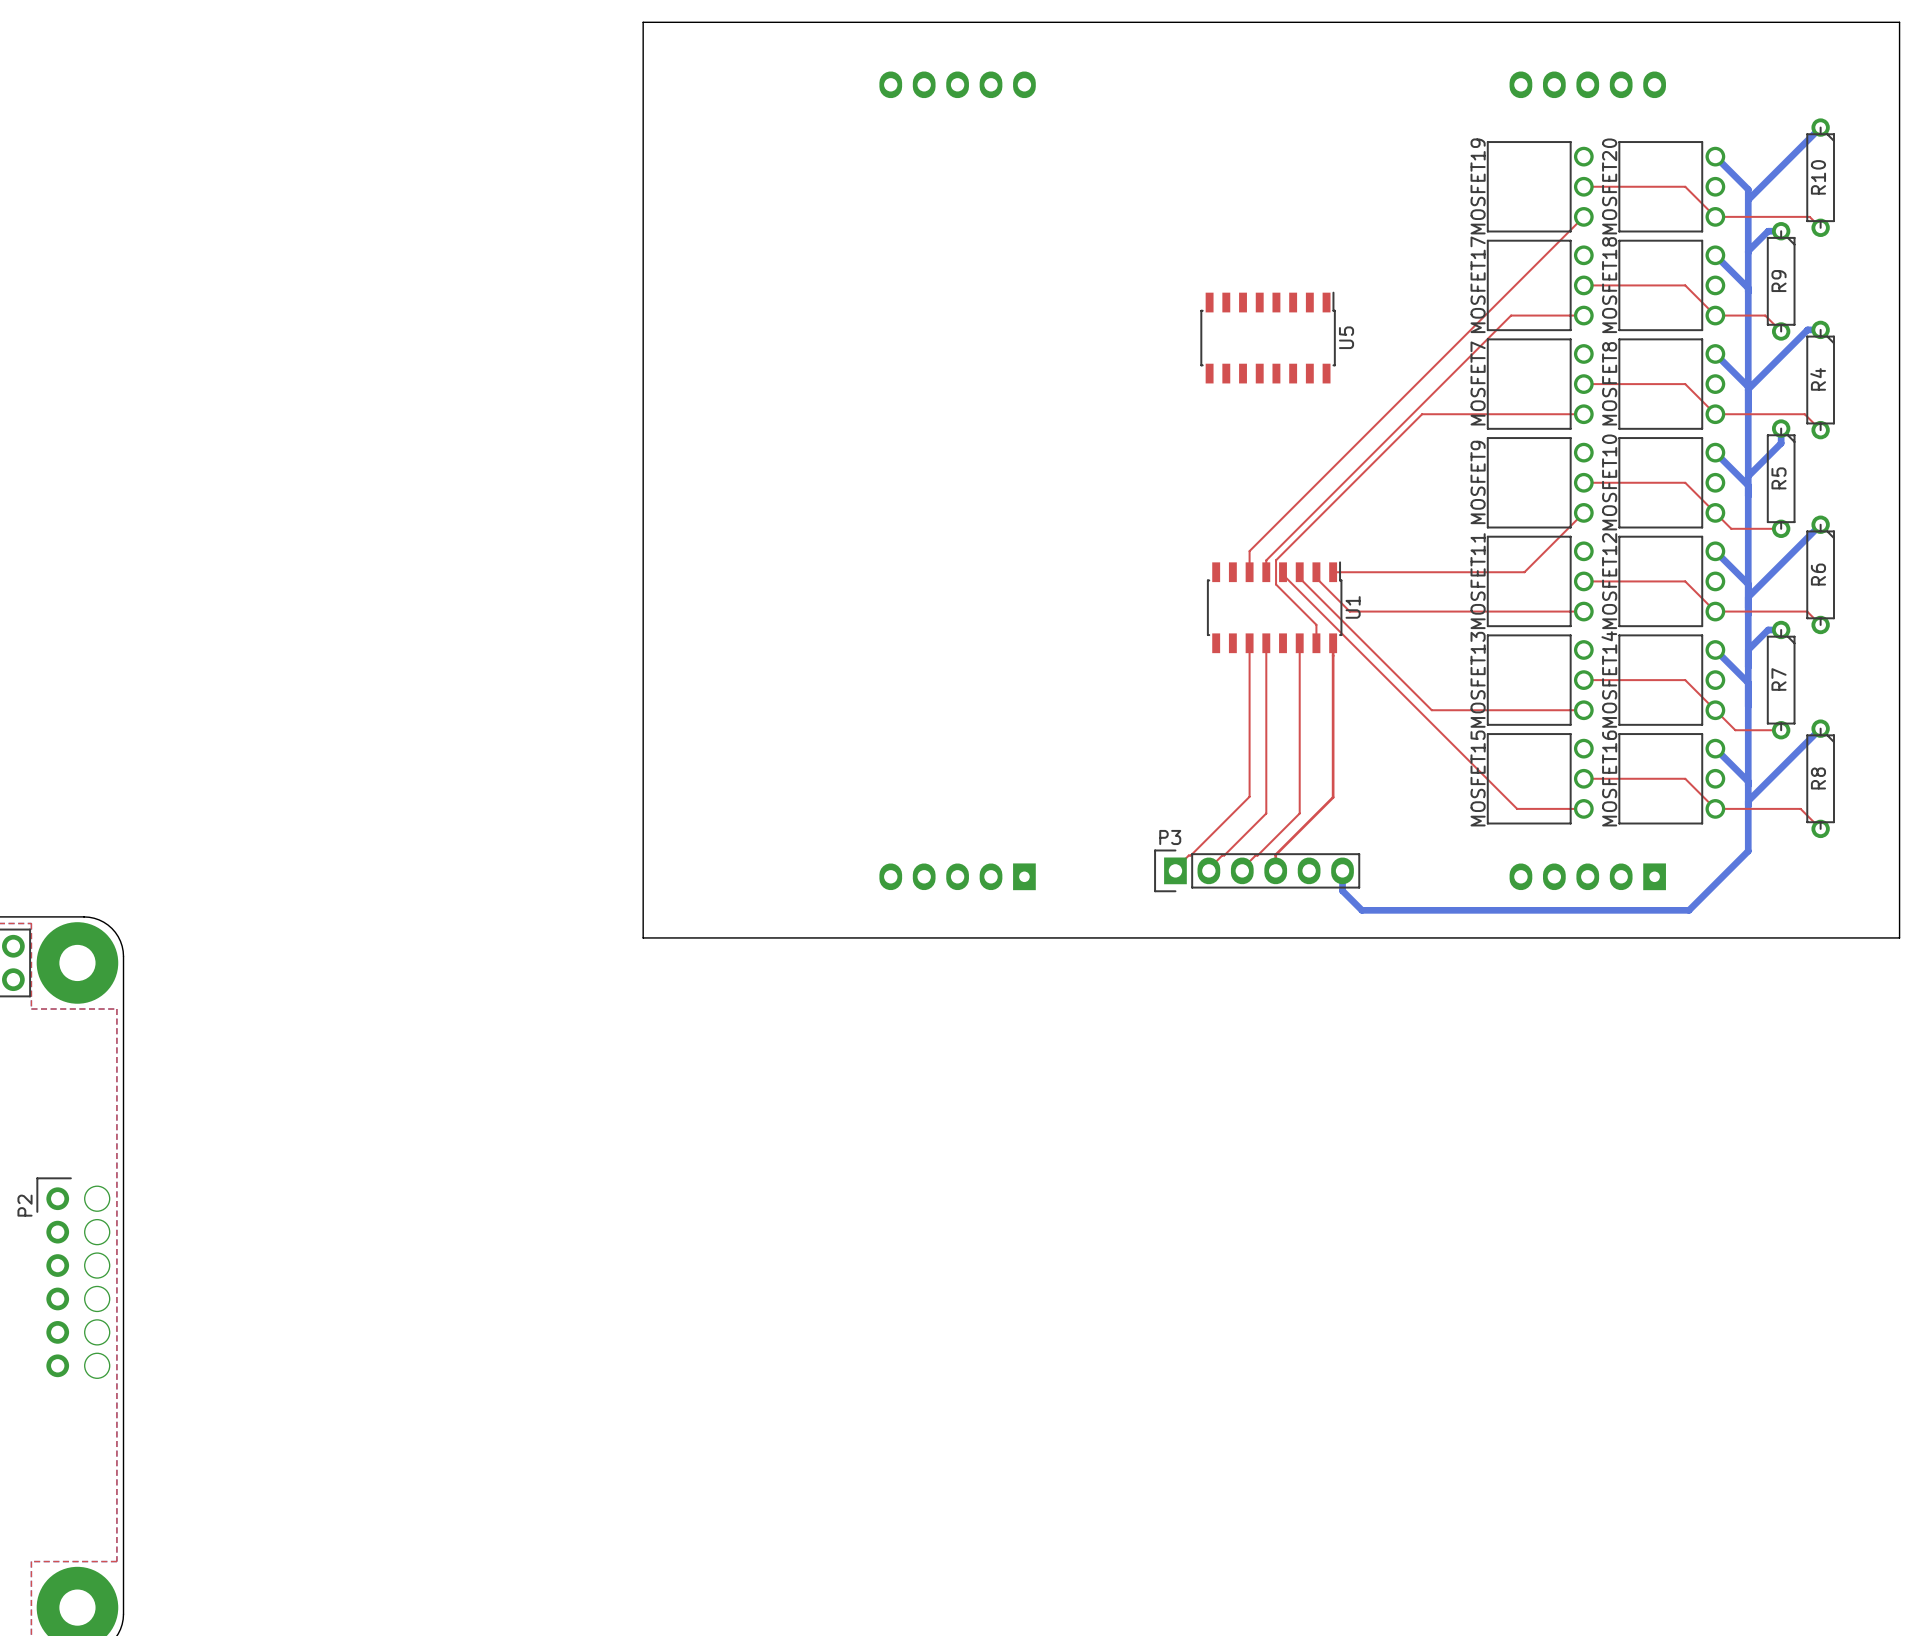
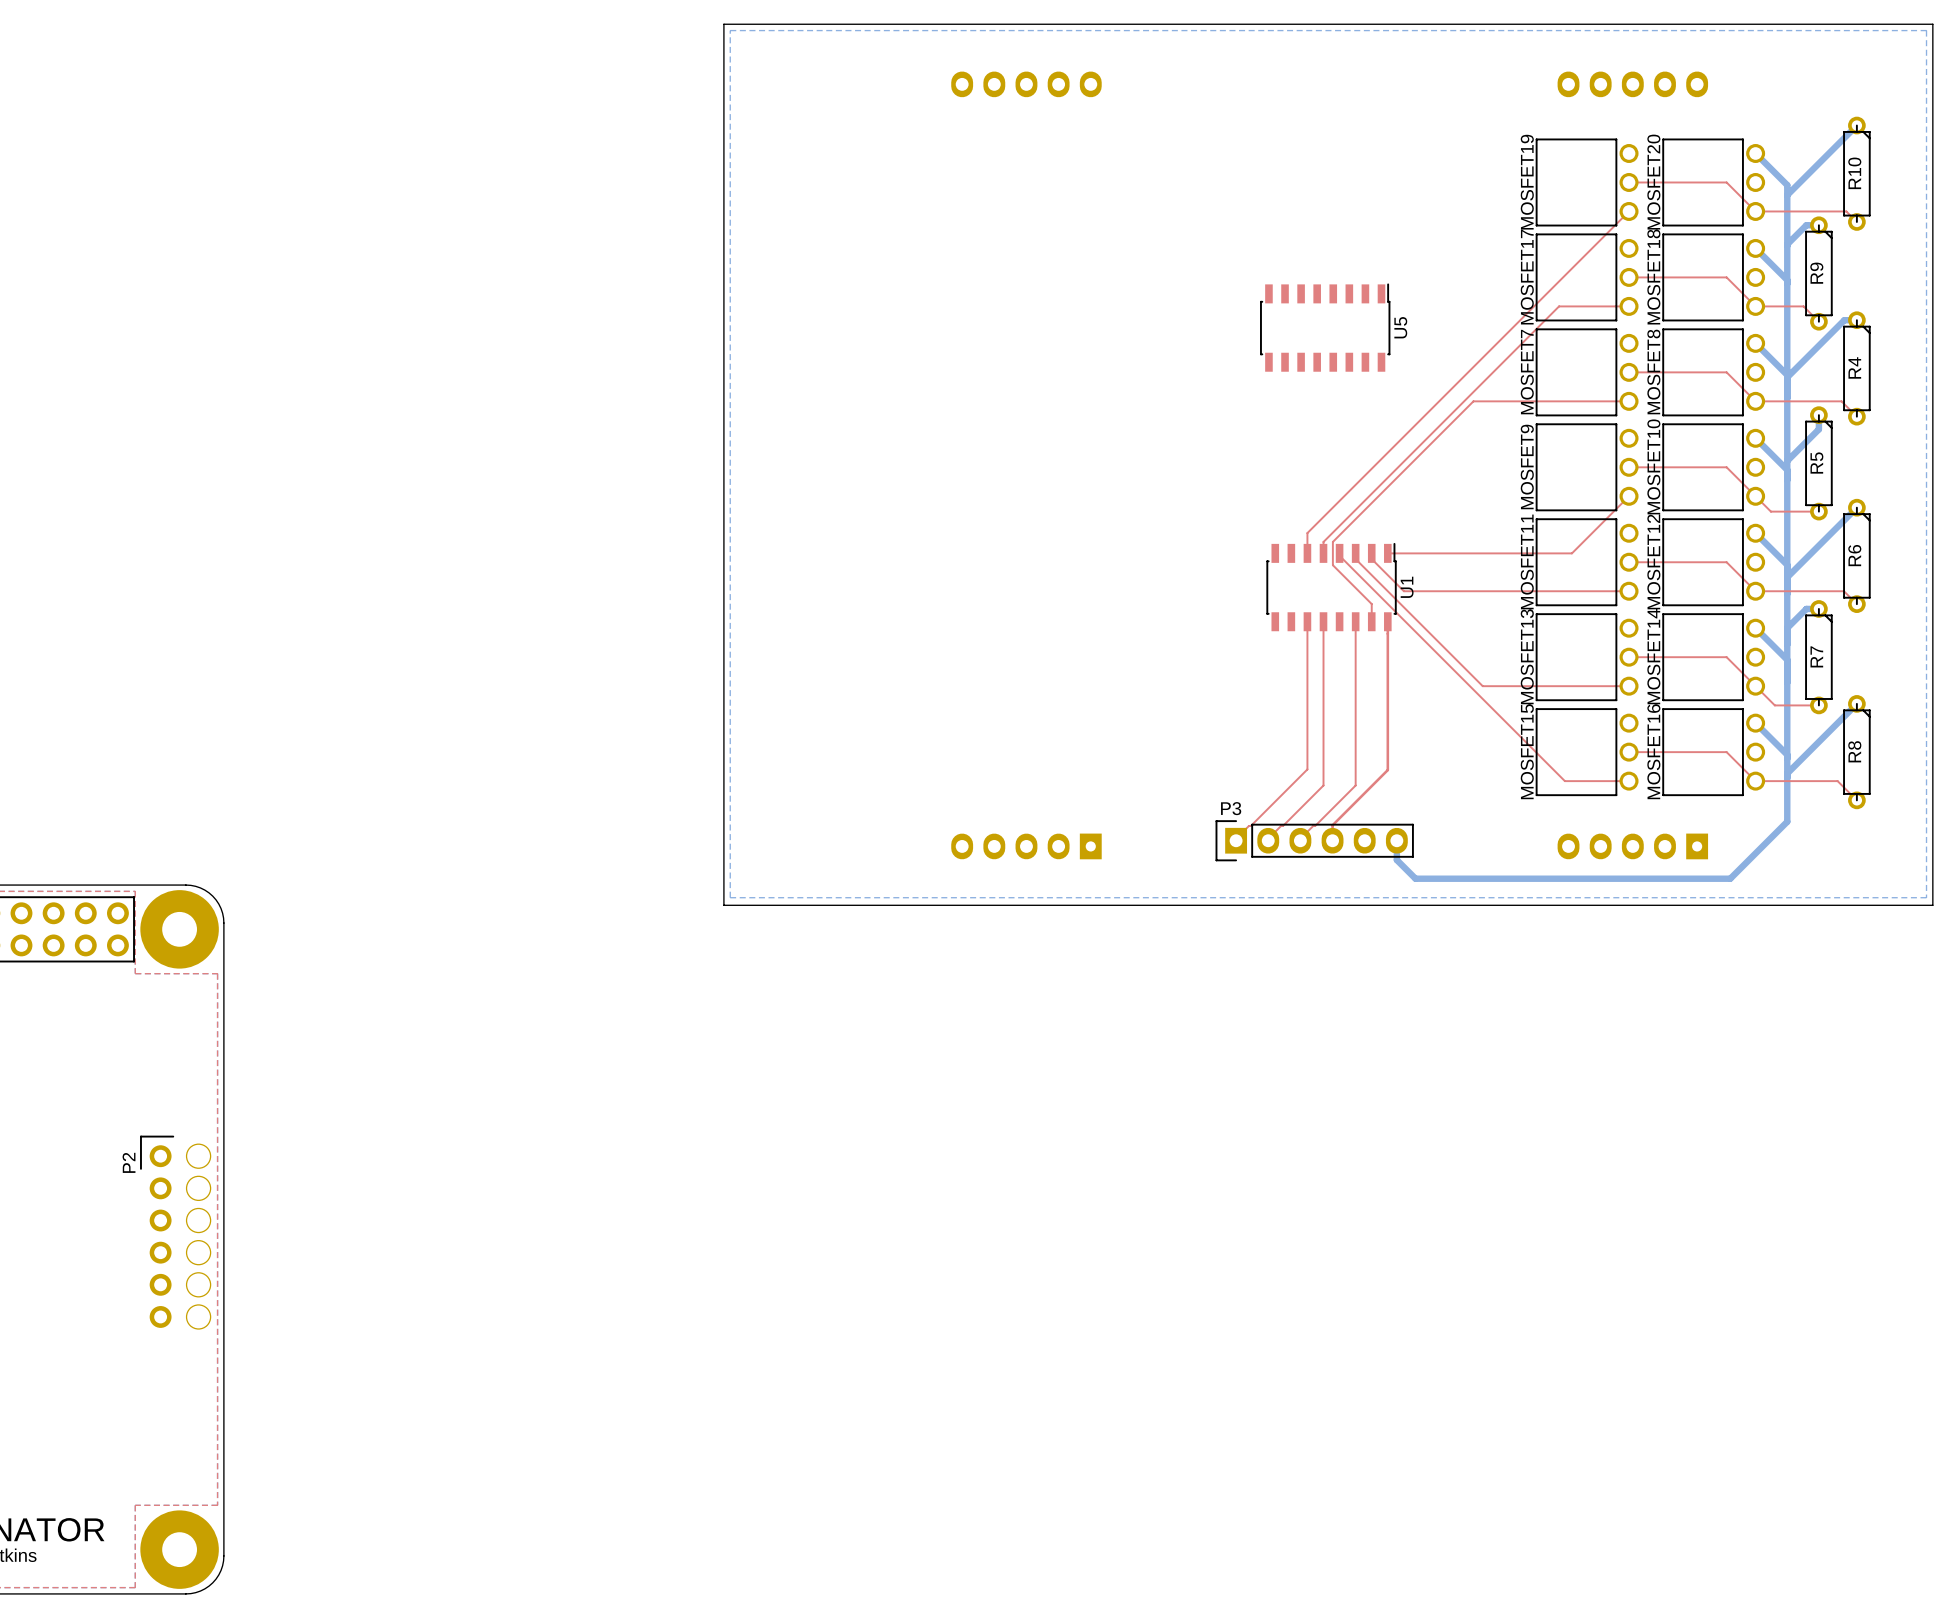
bottom zone outline: none -> (730, 30) (1926, 30) (1926, 897) (730, 897) (730, 30)

